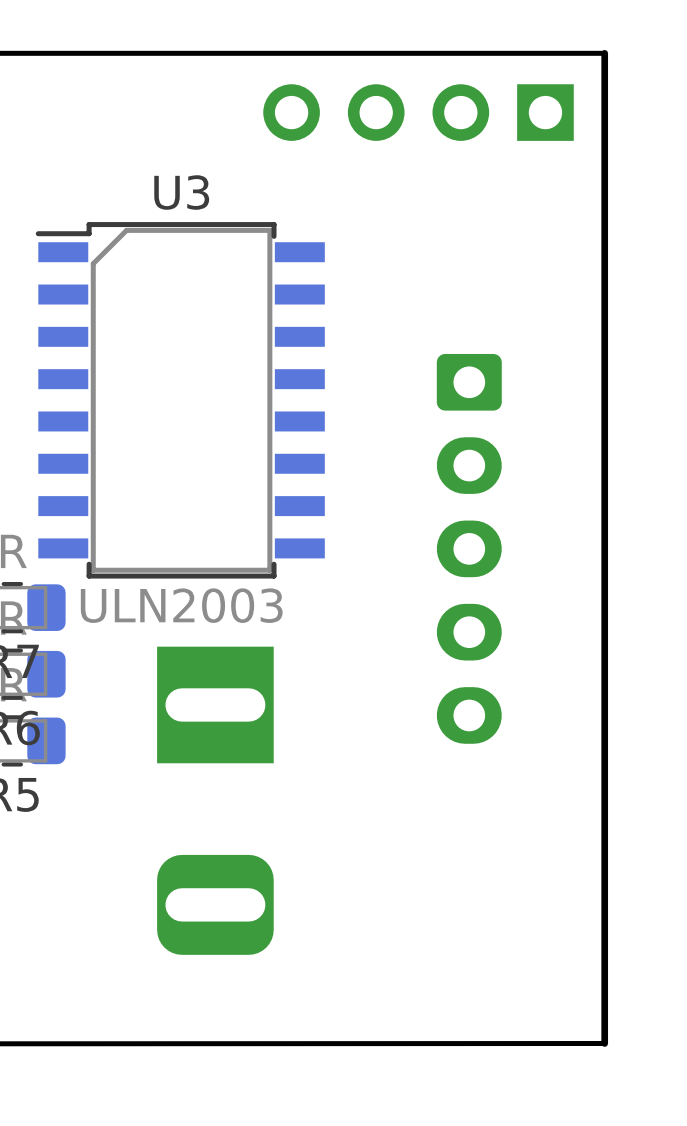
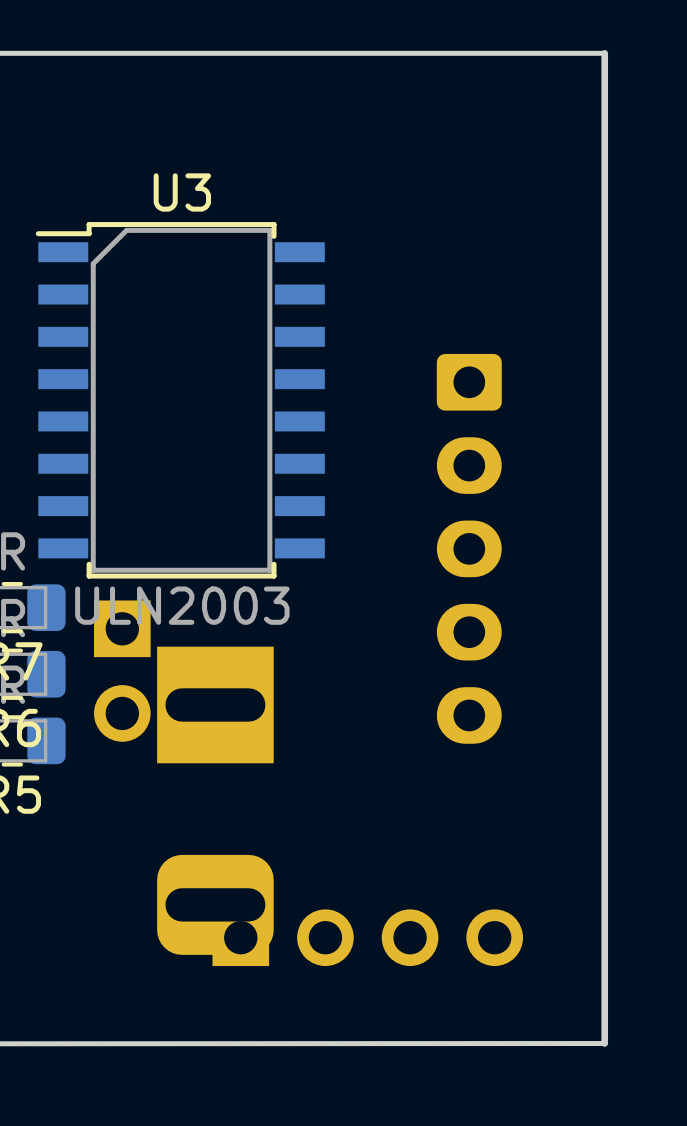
part rotation: 0° (418, 112) -> 180° (367, 937)
part position: (418, 112) -> (367, 937)
part: none -> (122, 671)

